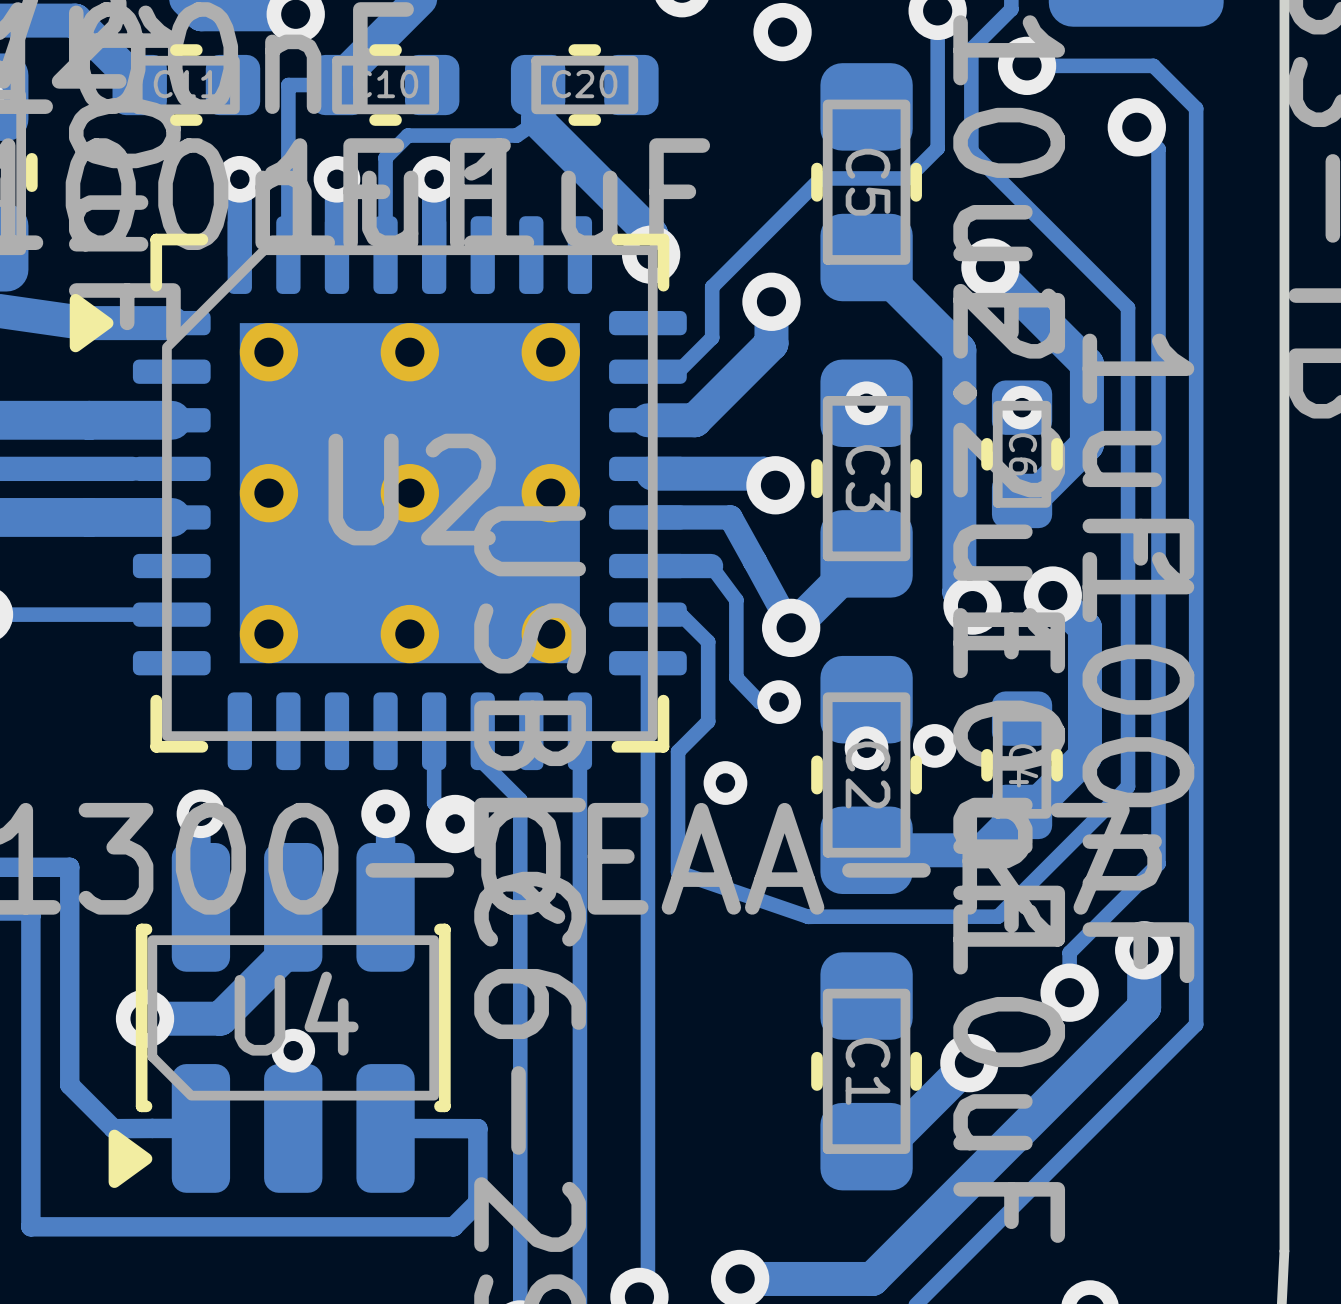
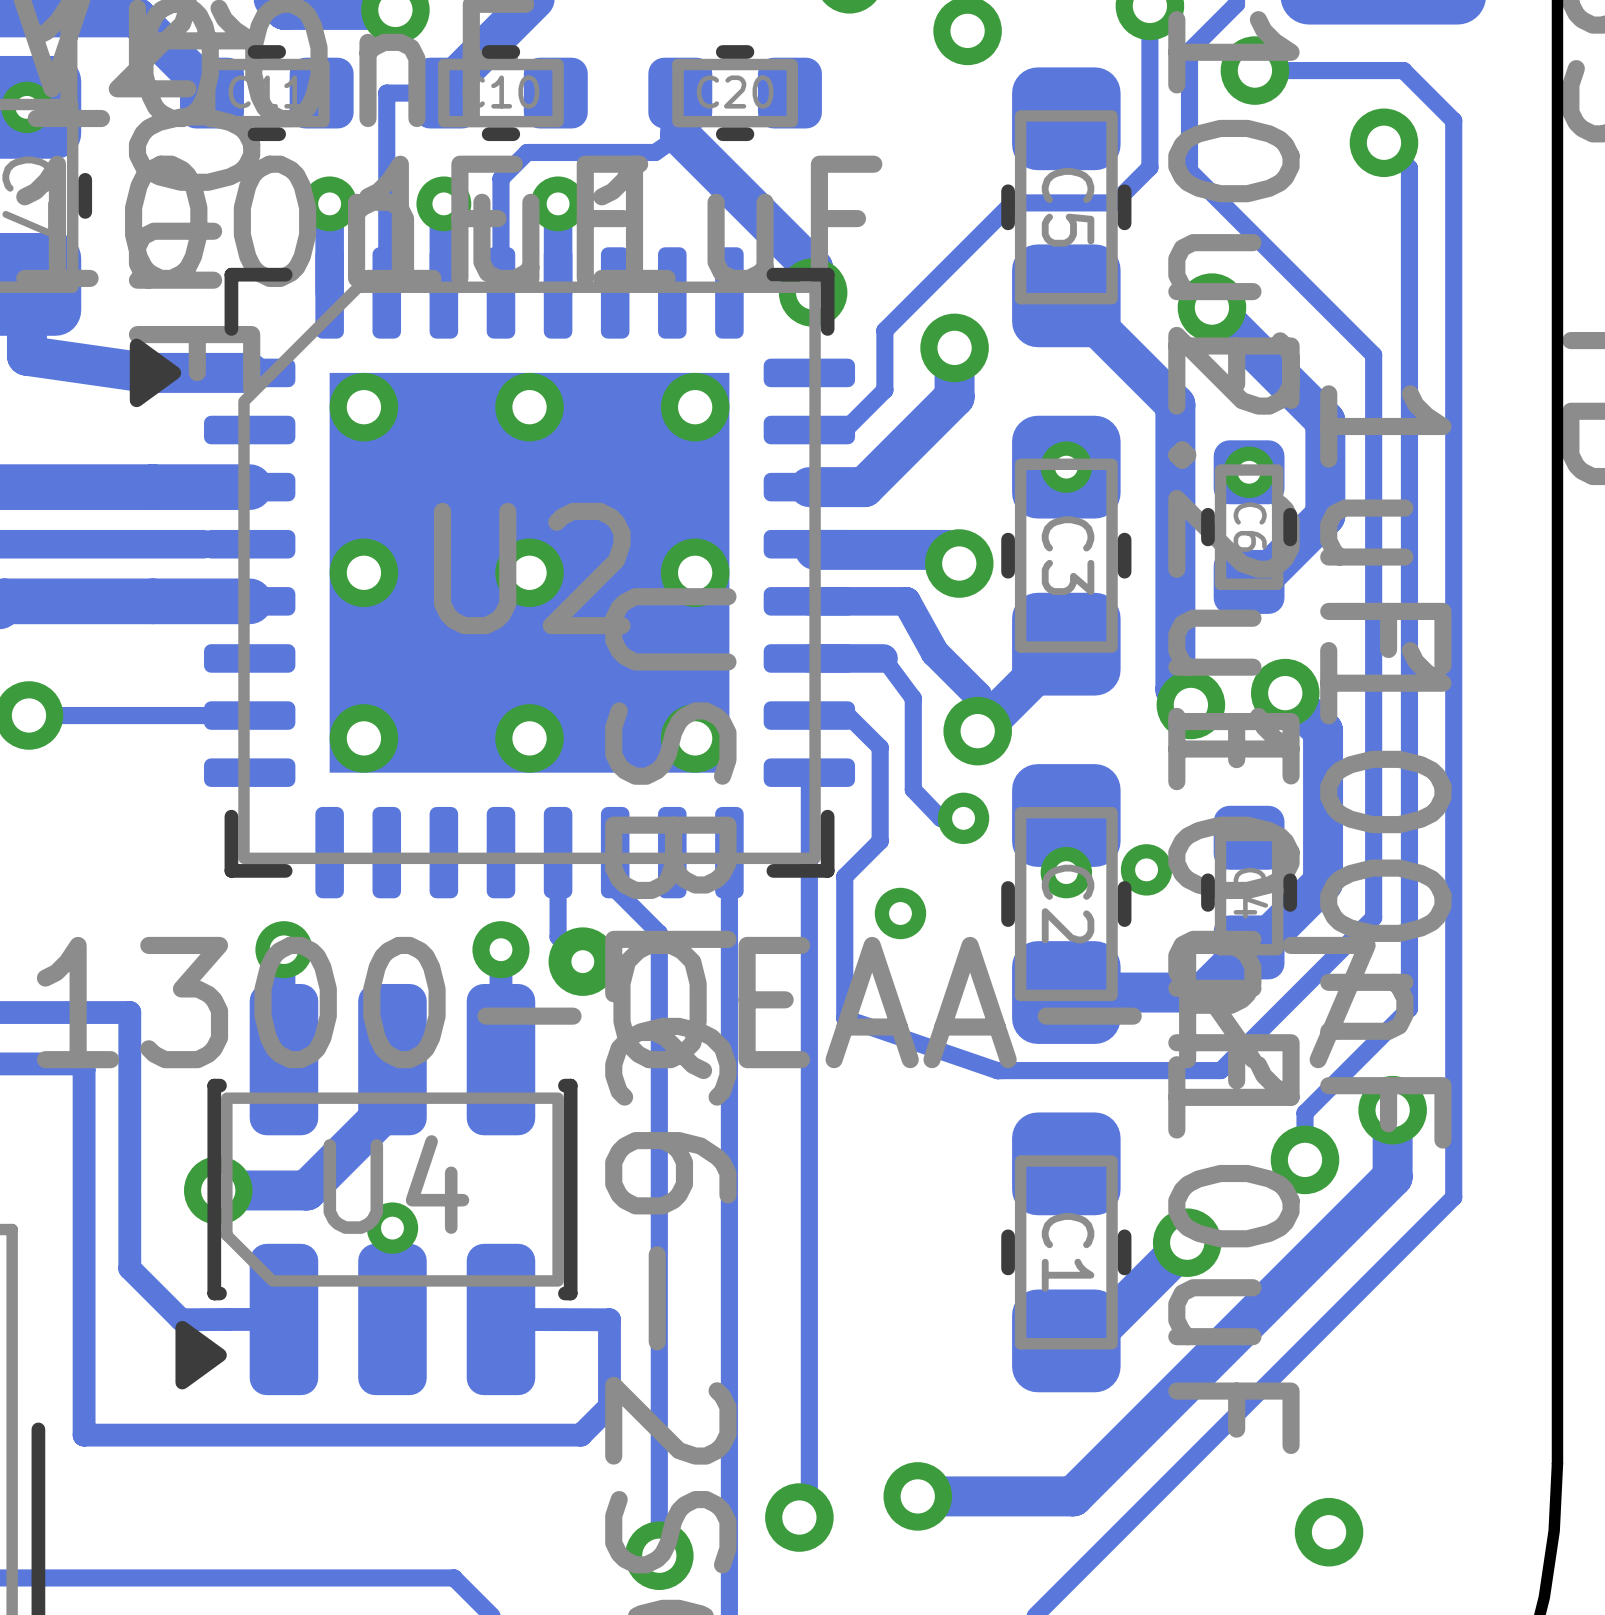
track: (754, 561) (791, 627) -> (934, 652) (977, 695) (977, 731)

